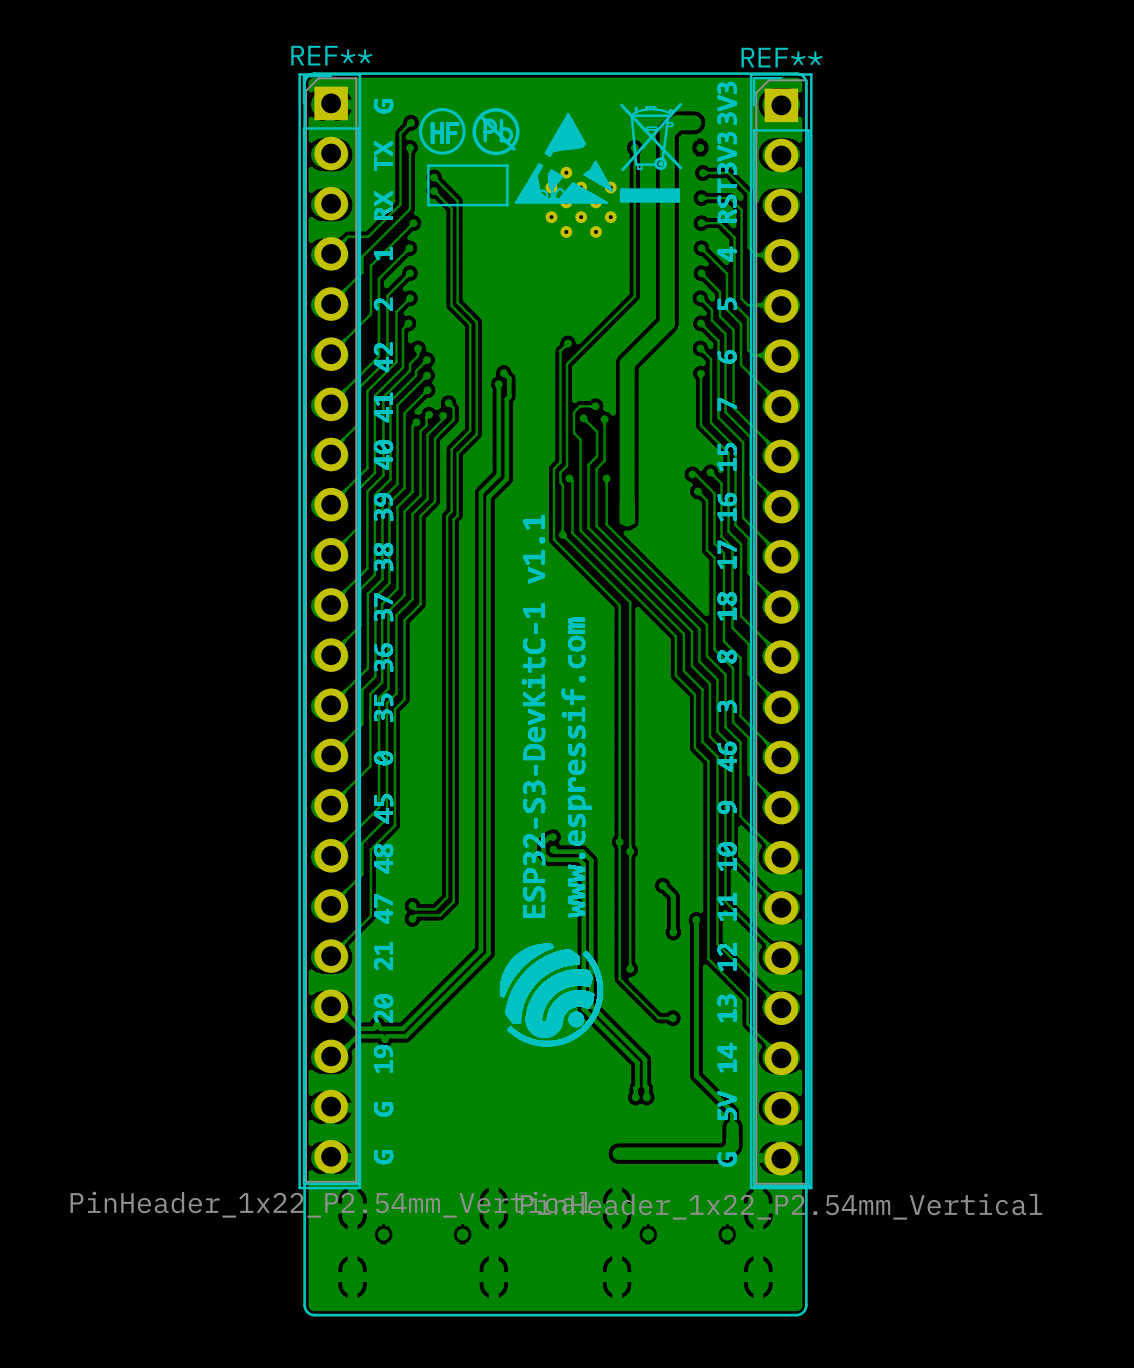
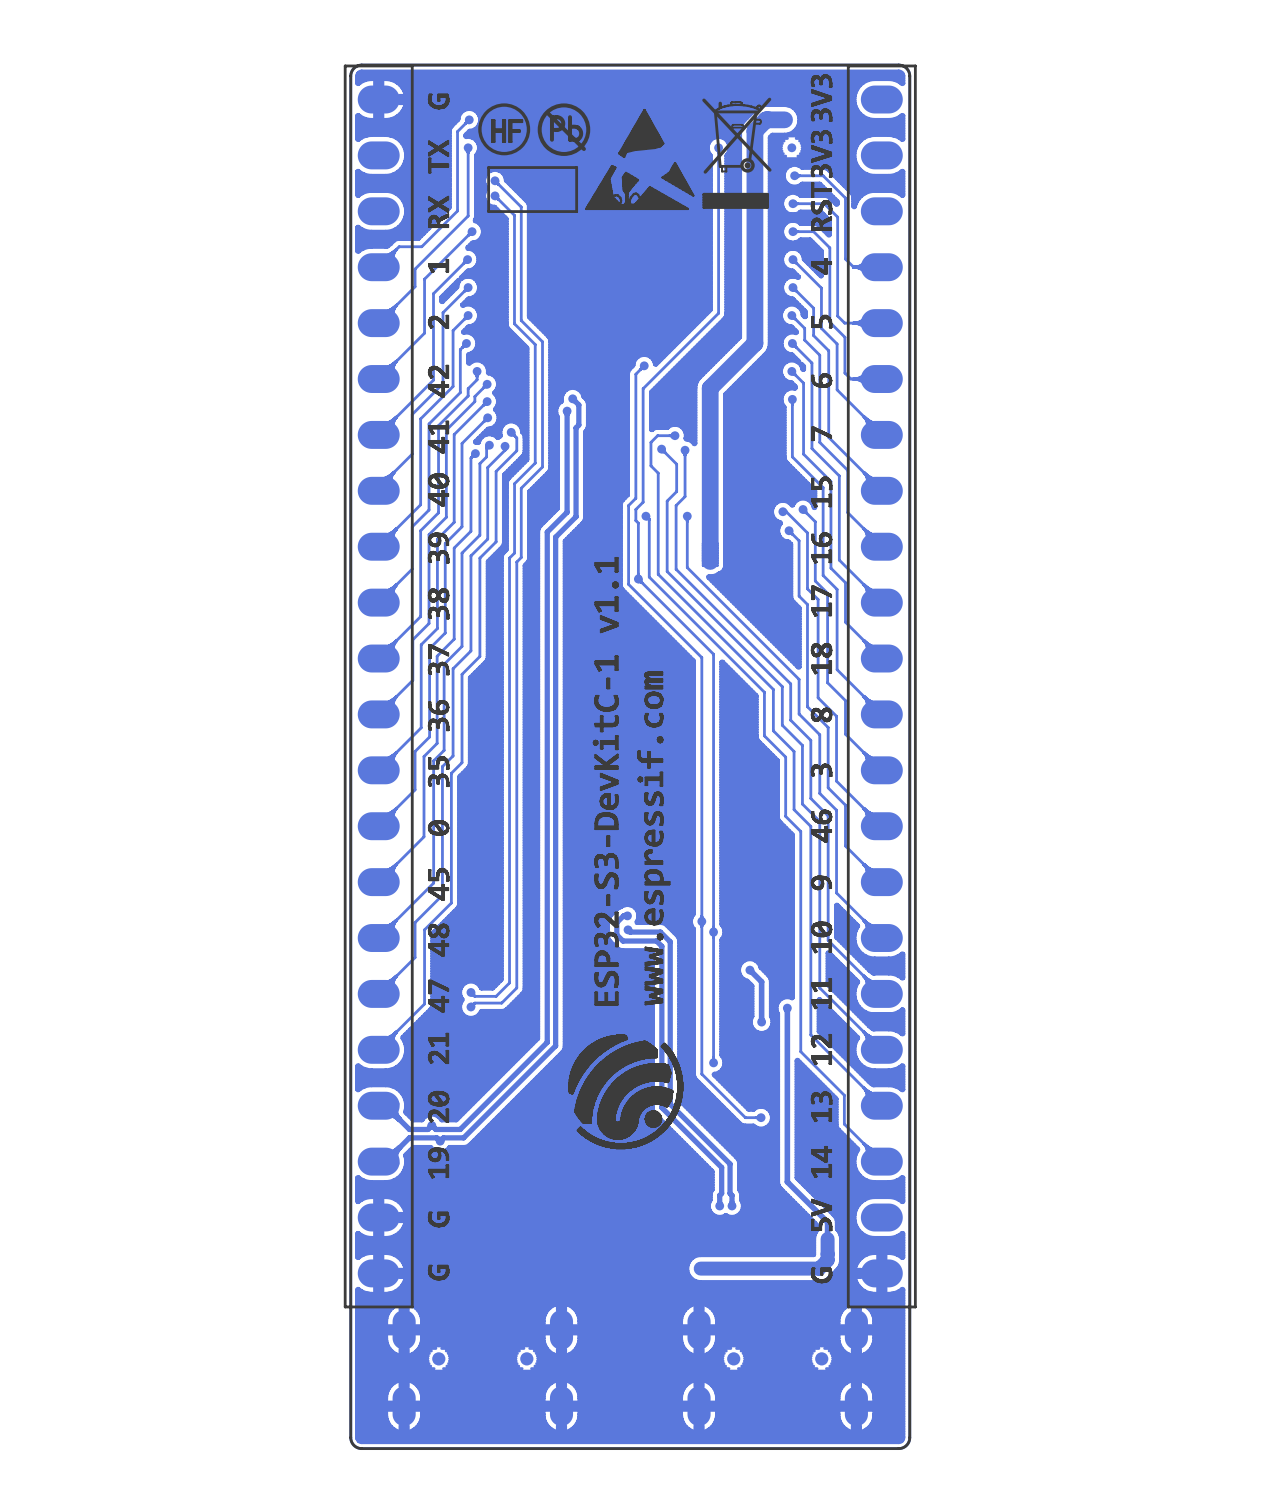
part: (581, 202) -> none
REF**: PinHeader_1x22_P2.54mm_Vertical (331, 630) -> none
REF**: PinHeader_1x22_P2.54mm_Vertical (781, 632) -> none

